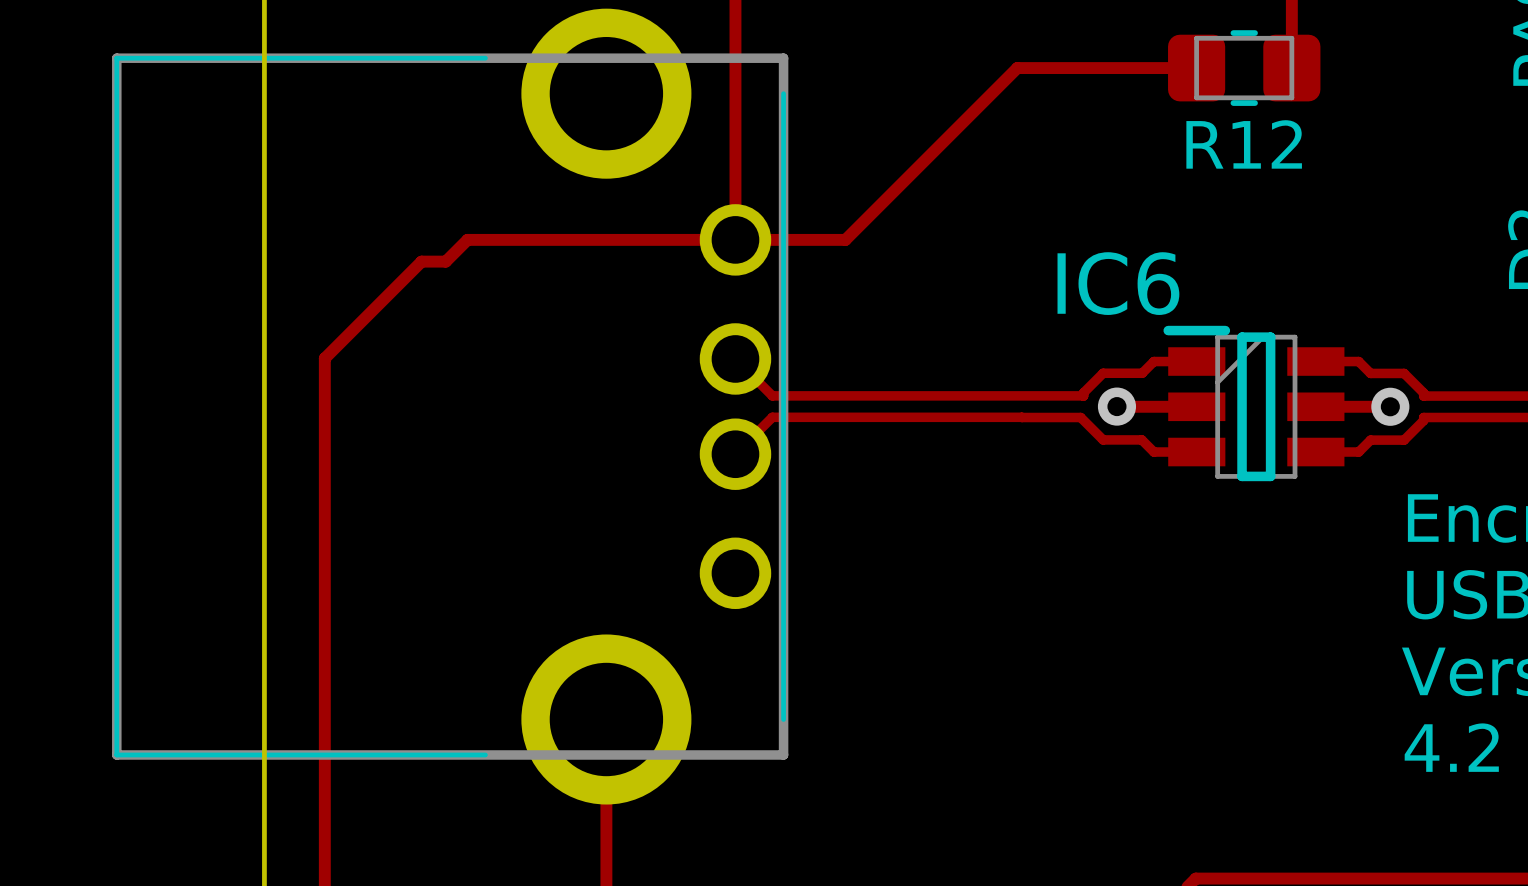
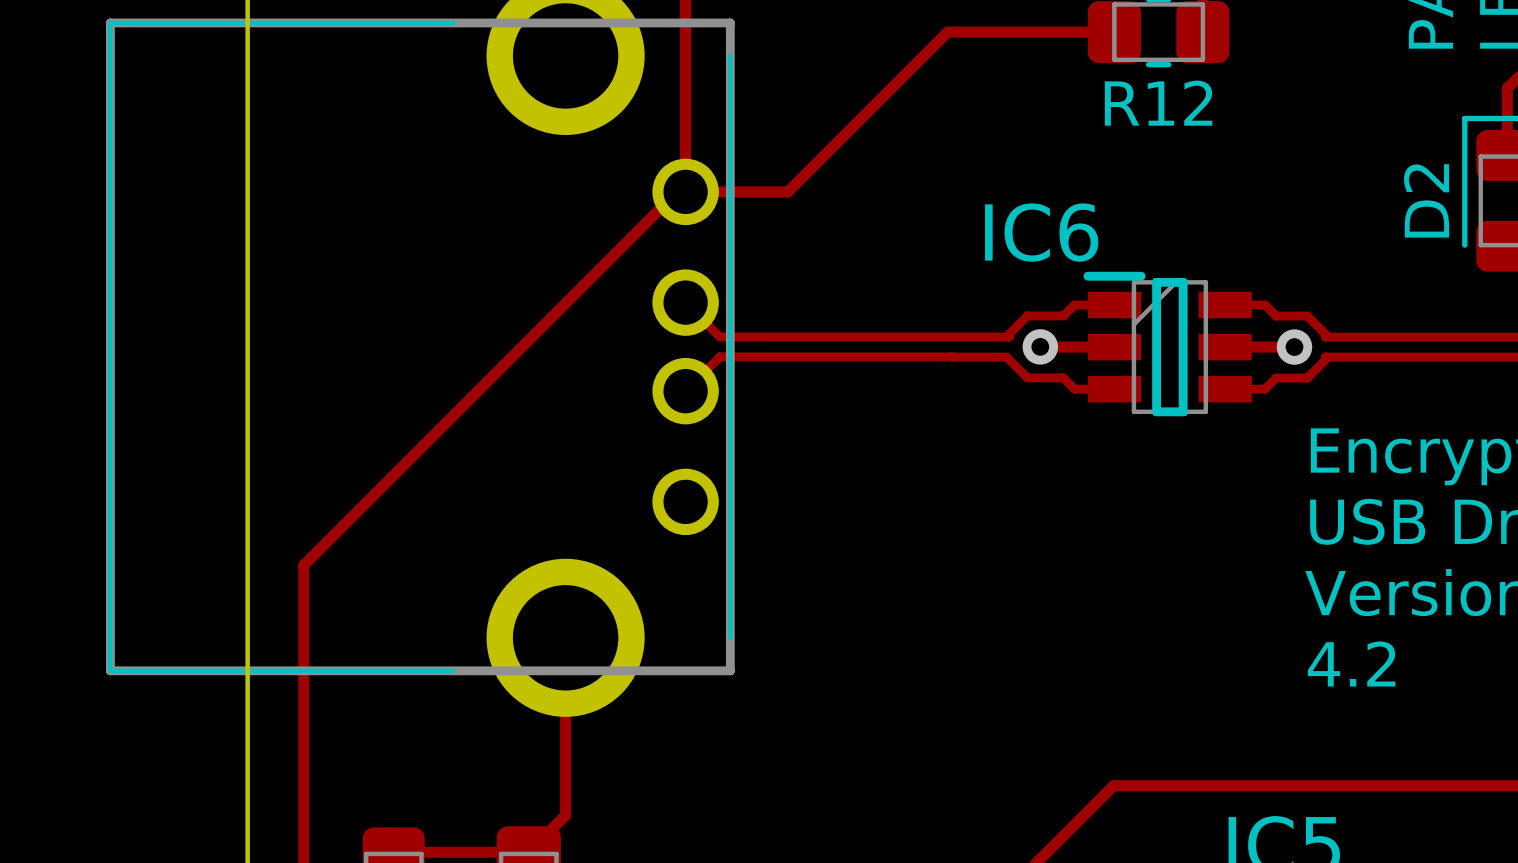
track: (726, 239) (467, 239) (445, 261) (421, 261) (324, 358) (324, 641) -> (677, 191) (303, 565)

